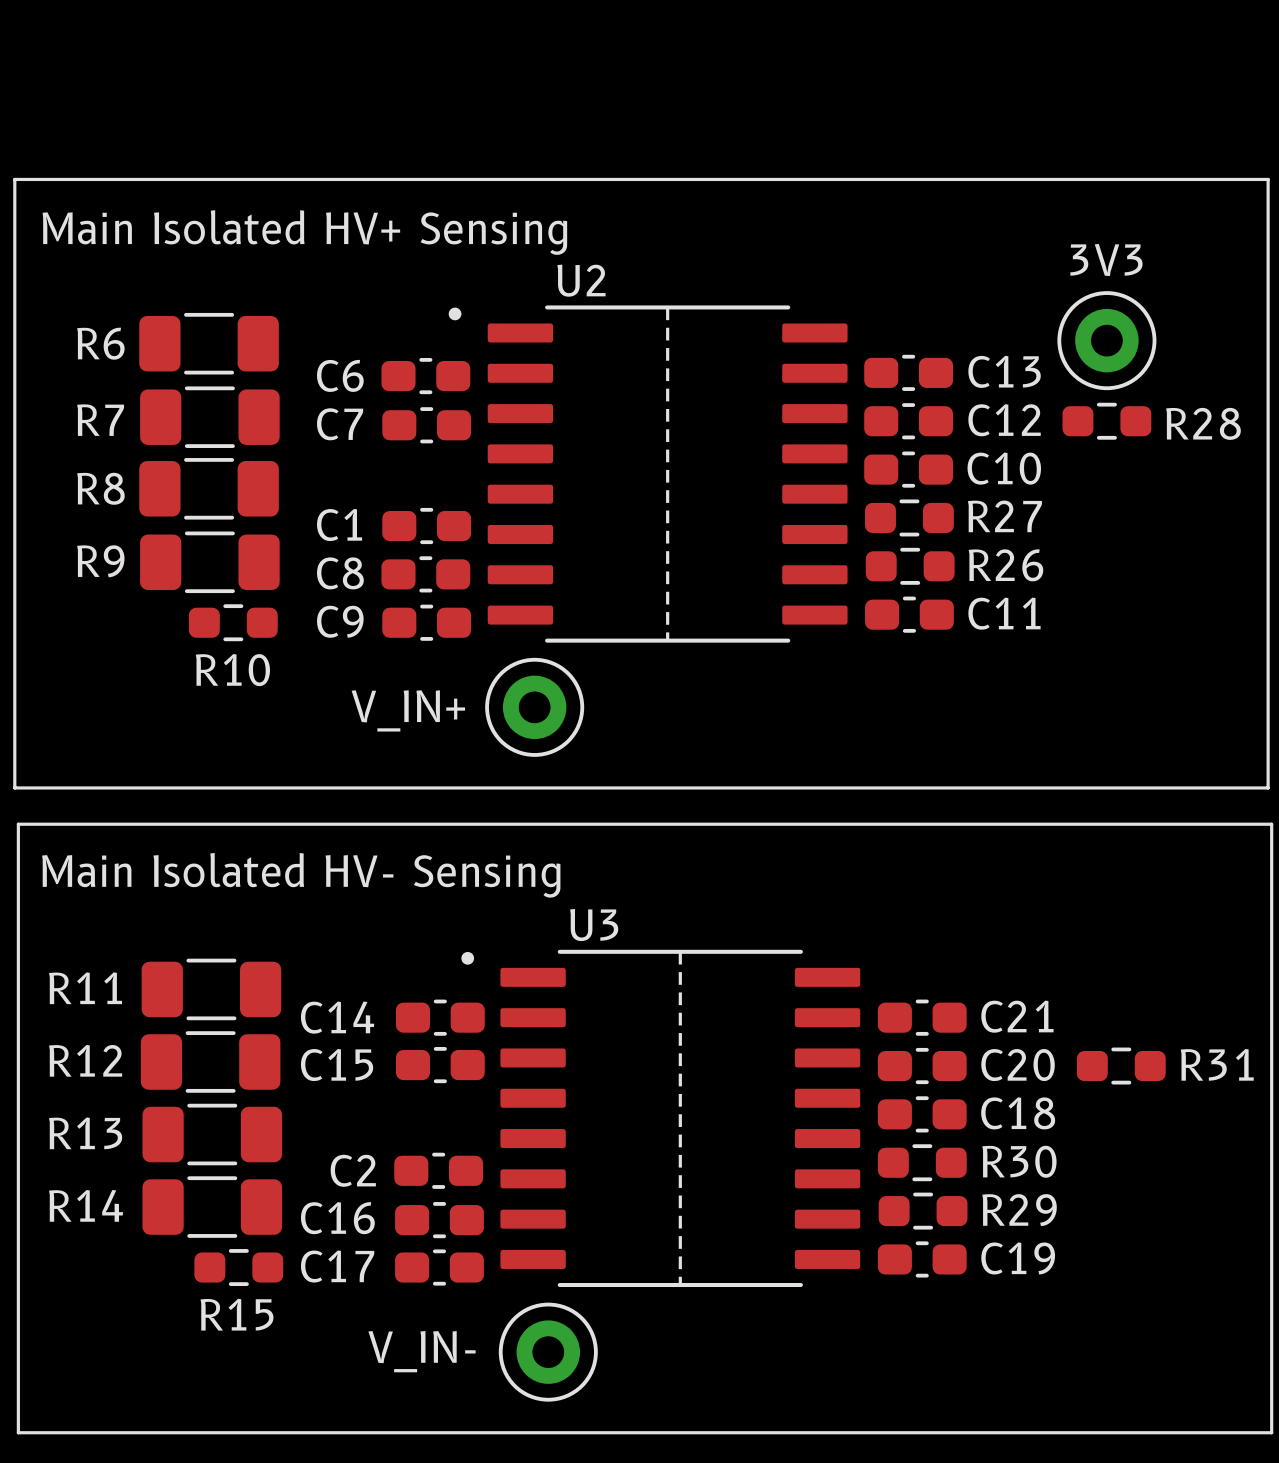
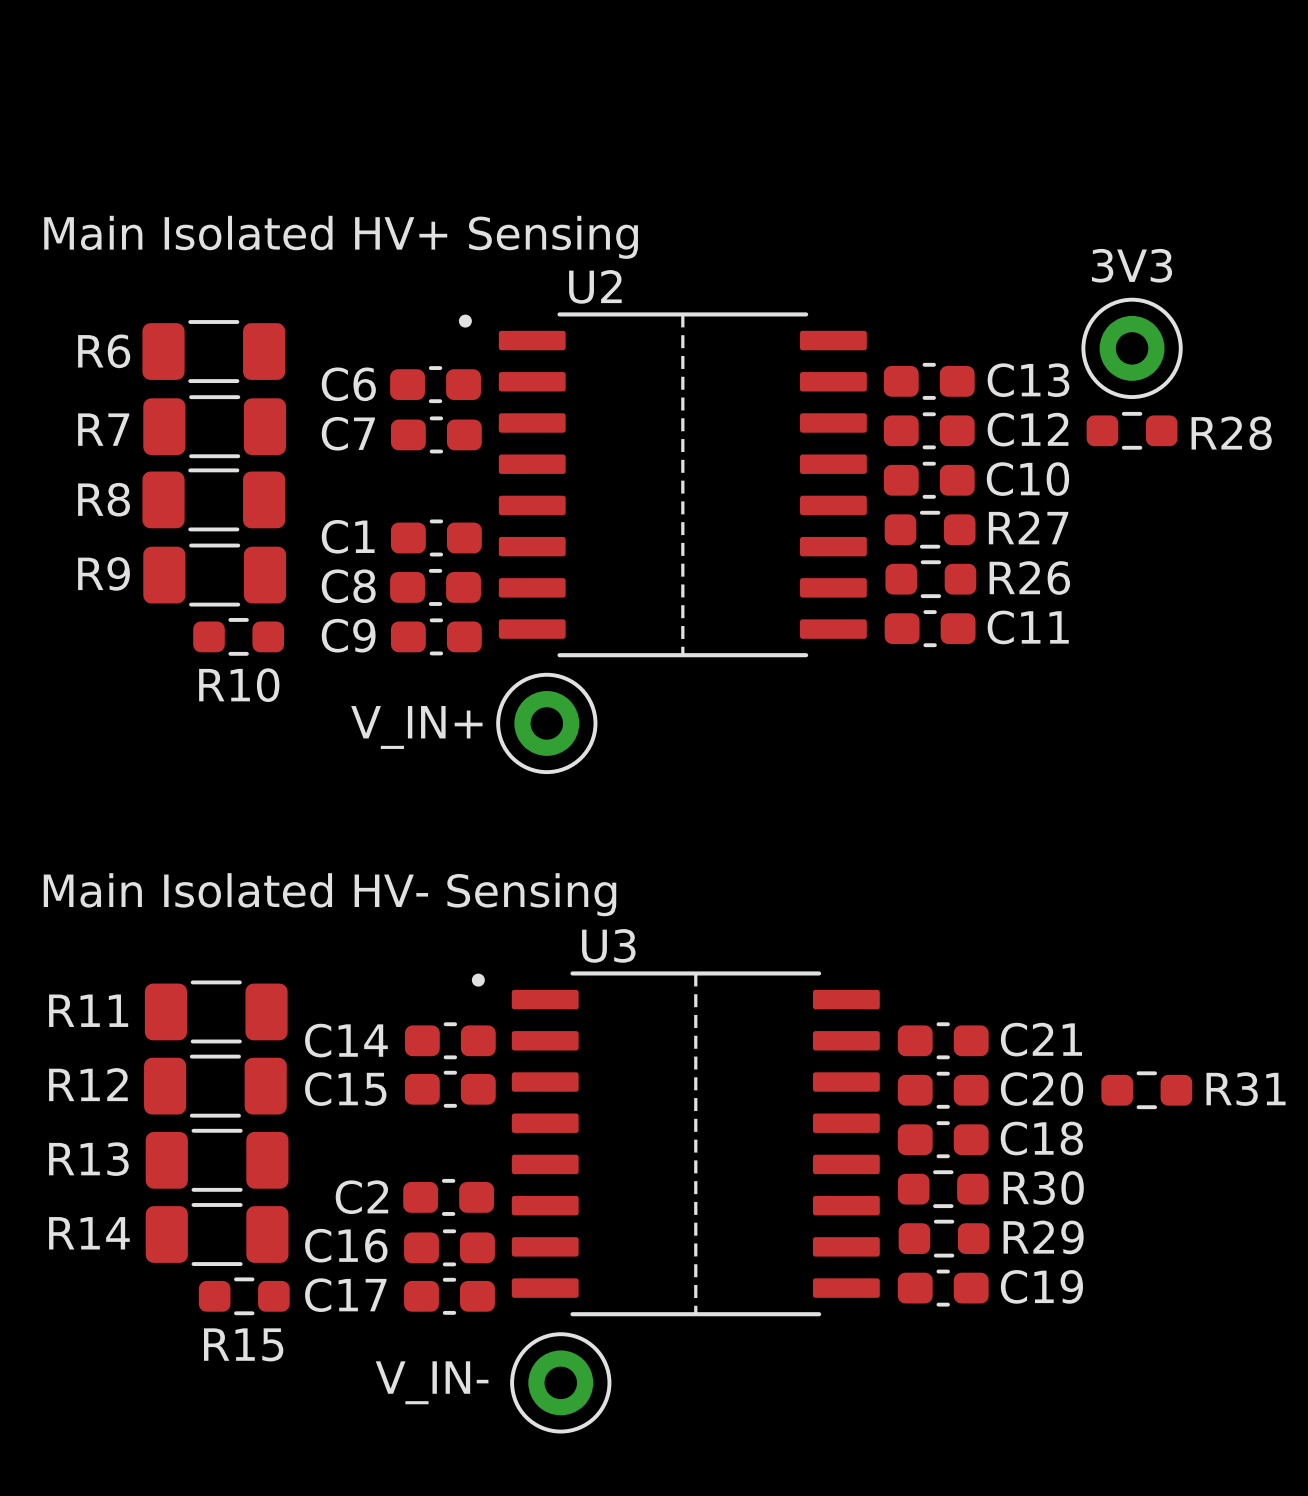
line: (14, 179) (1268, 179) (1268, 787) (14, 787) (14, 179) -> none
line: (18, 824) (1271, 824) (1271, 1432) (18, 1432) (18, 824) -> none

